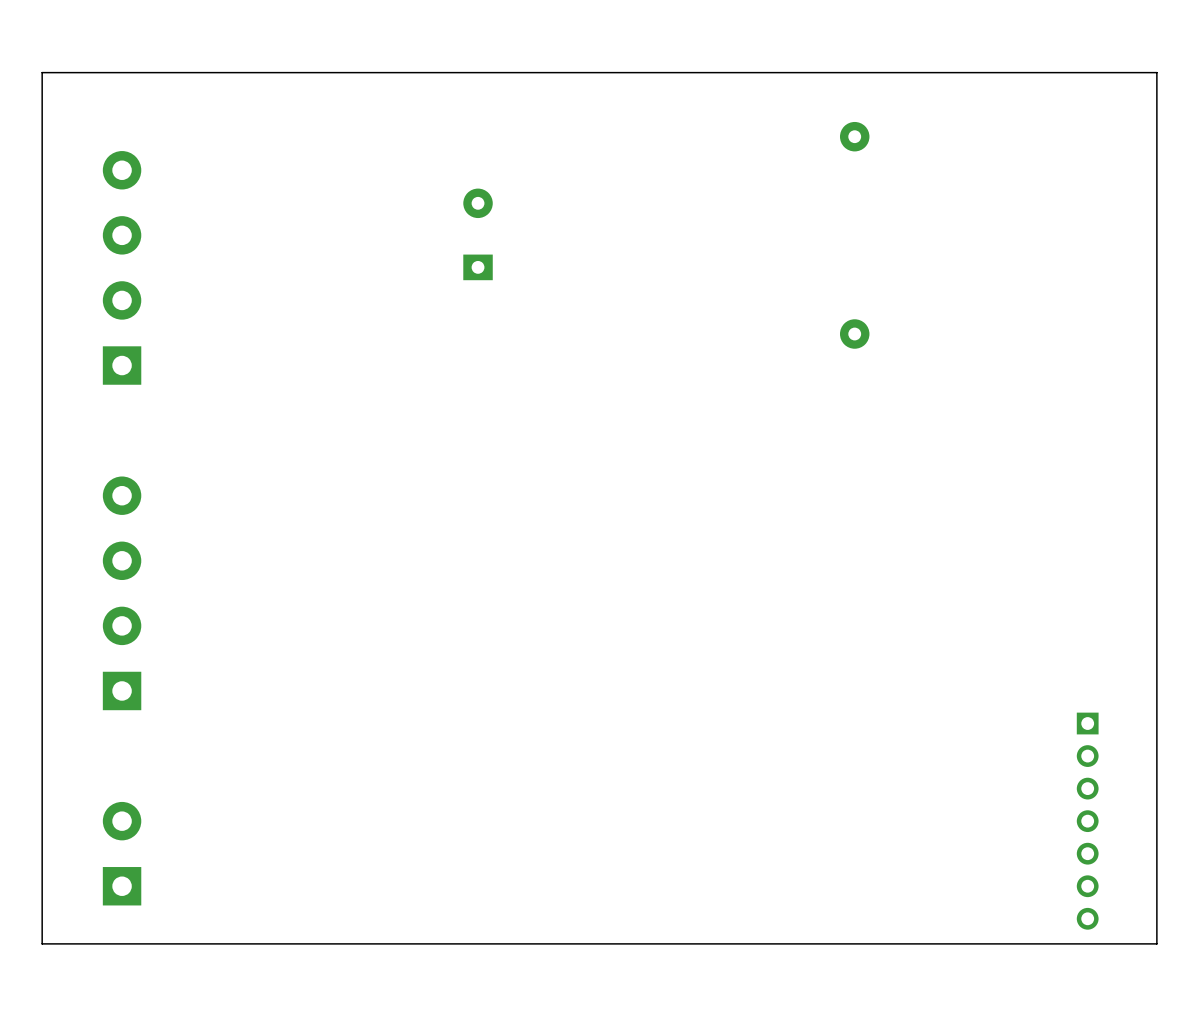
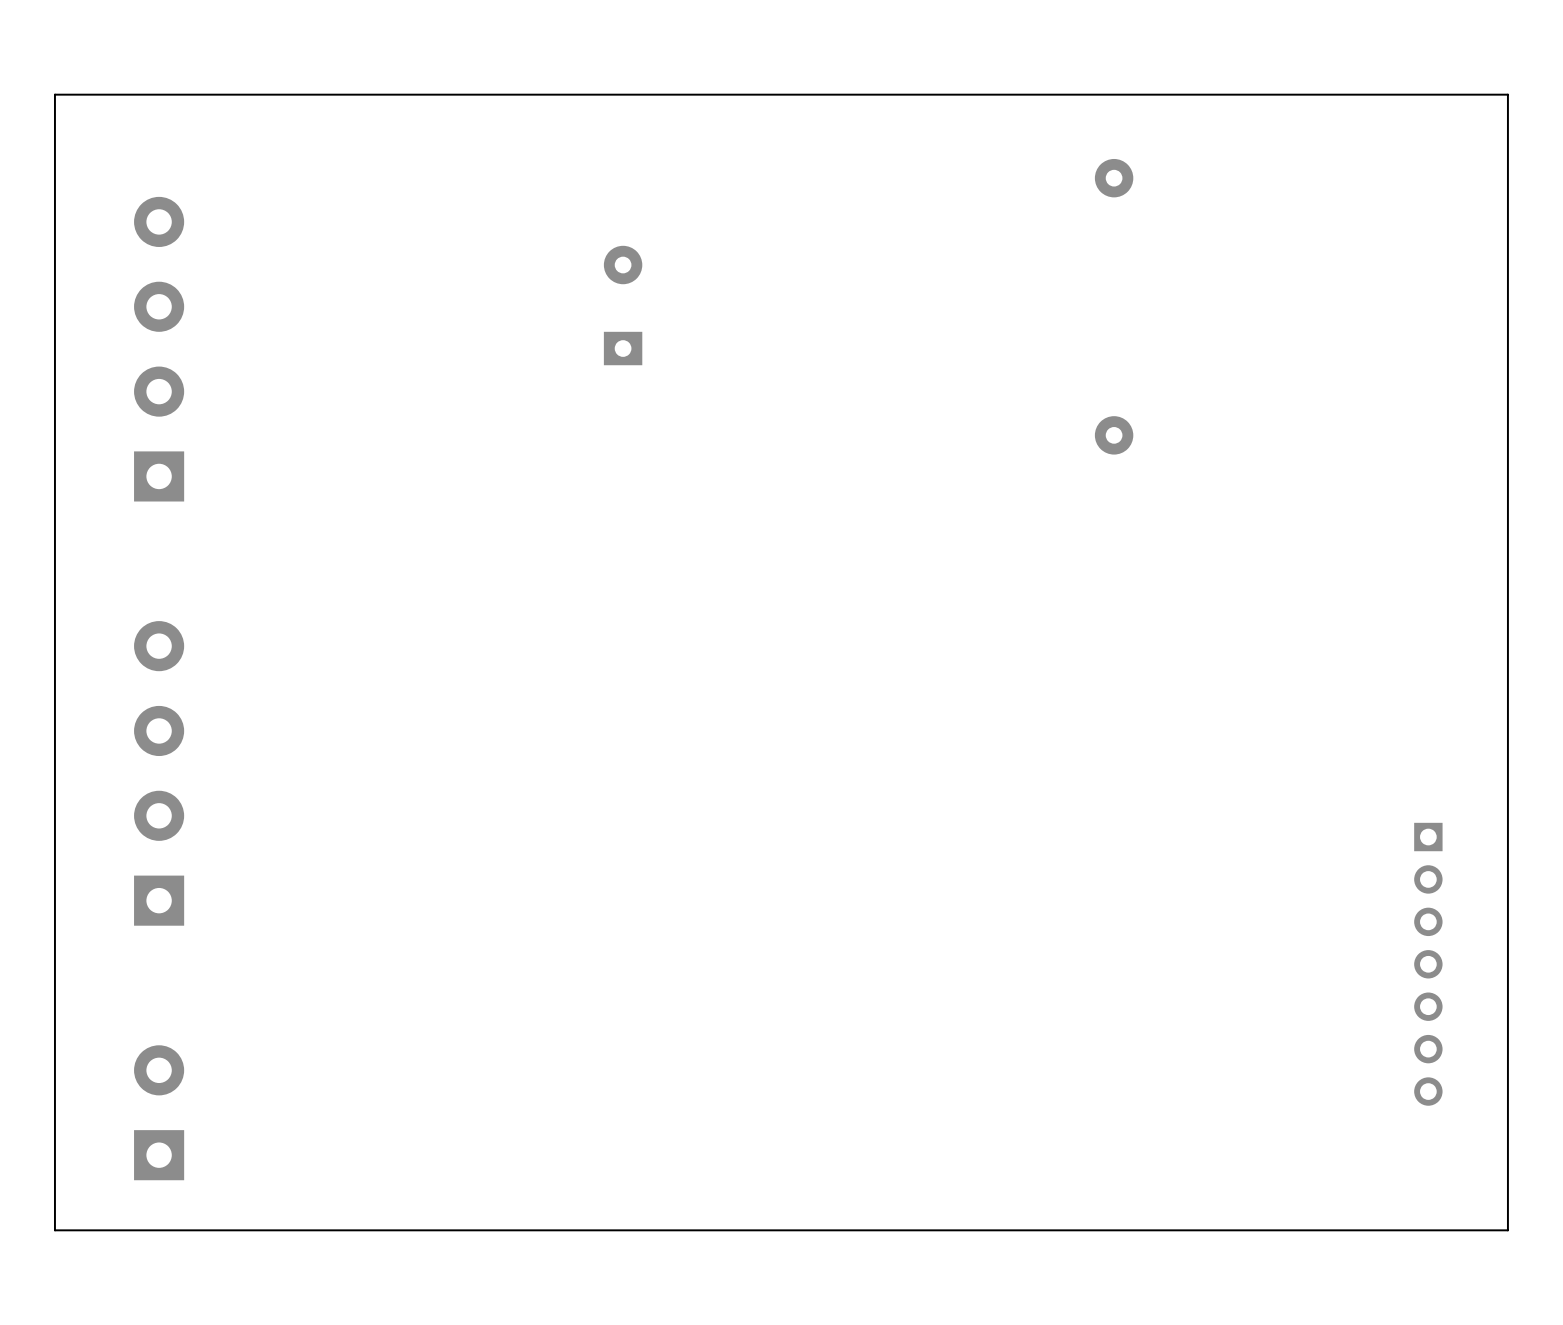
part position: (1087, 821) -> (1428, 964)

